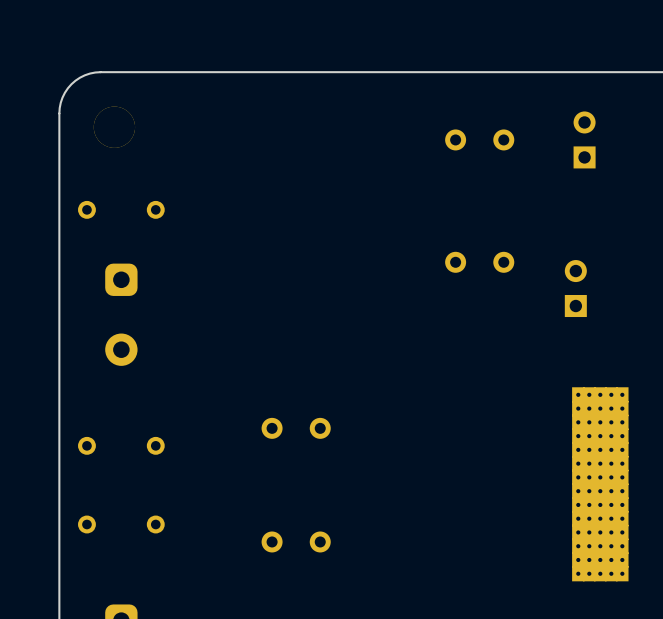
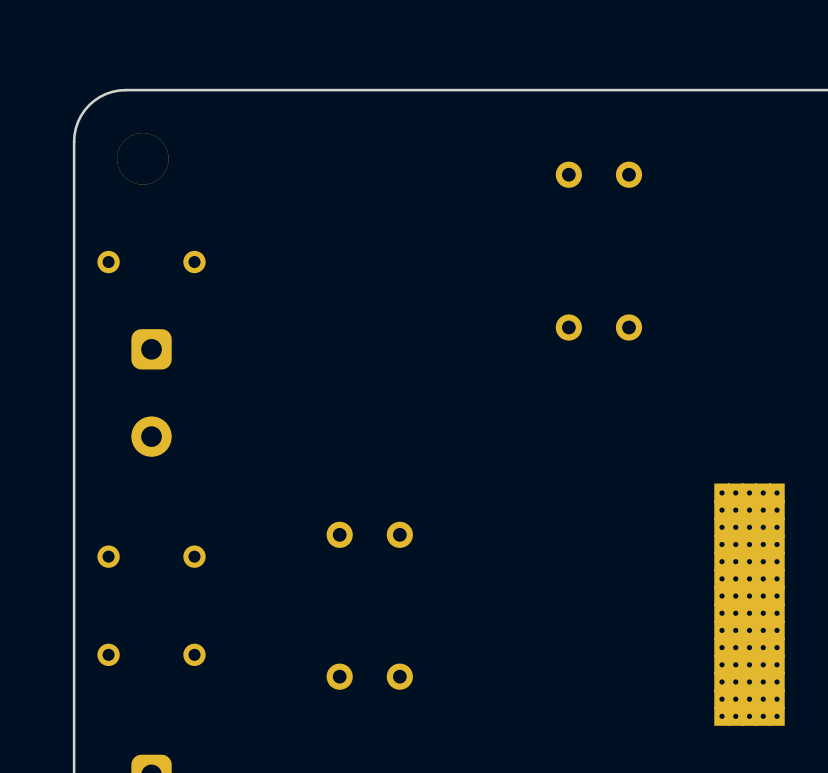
part: (584, 139) -> none
part: (575, 288) -> none

